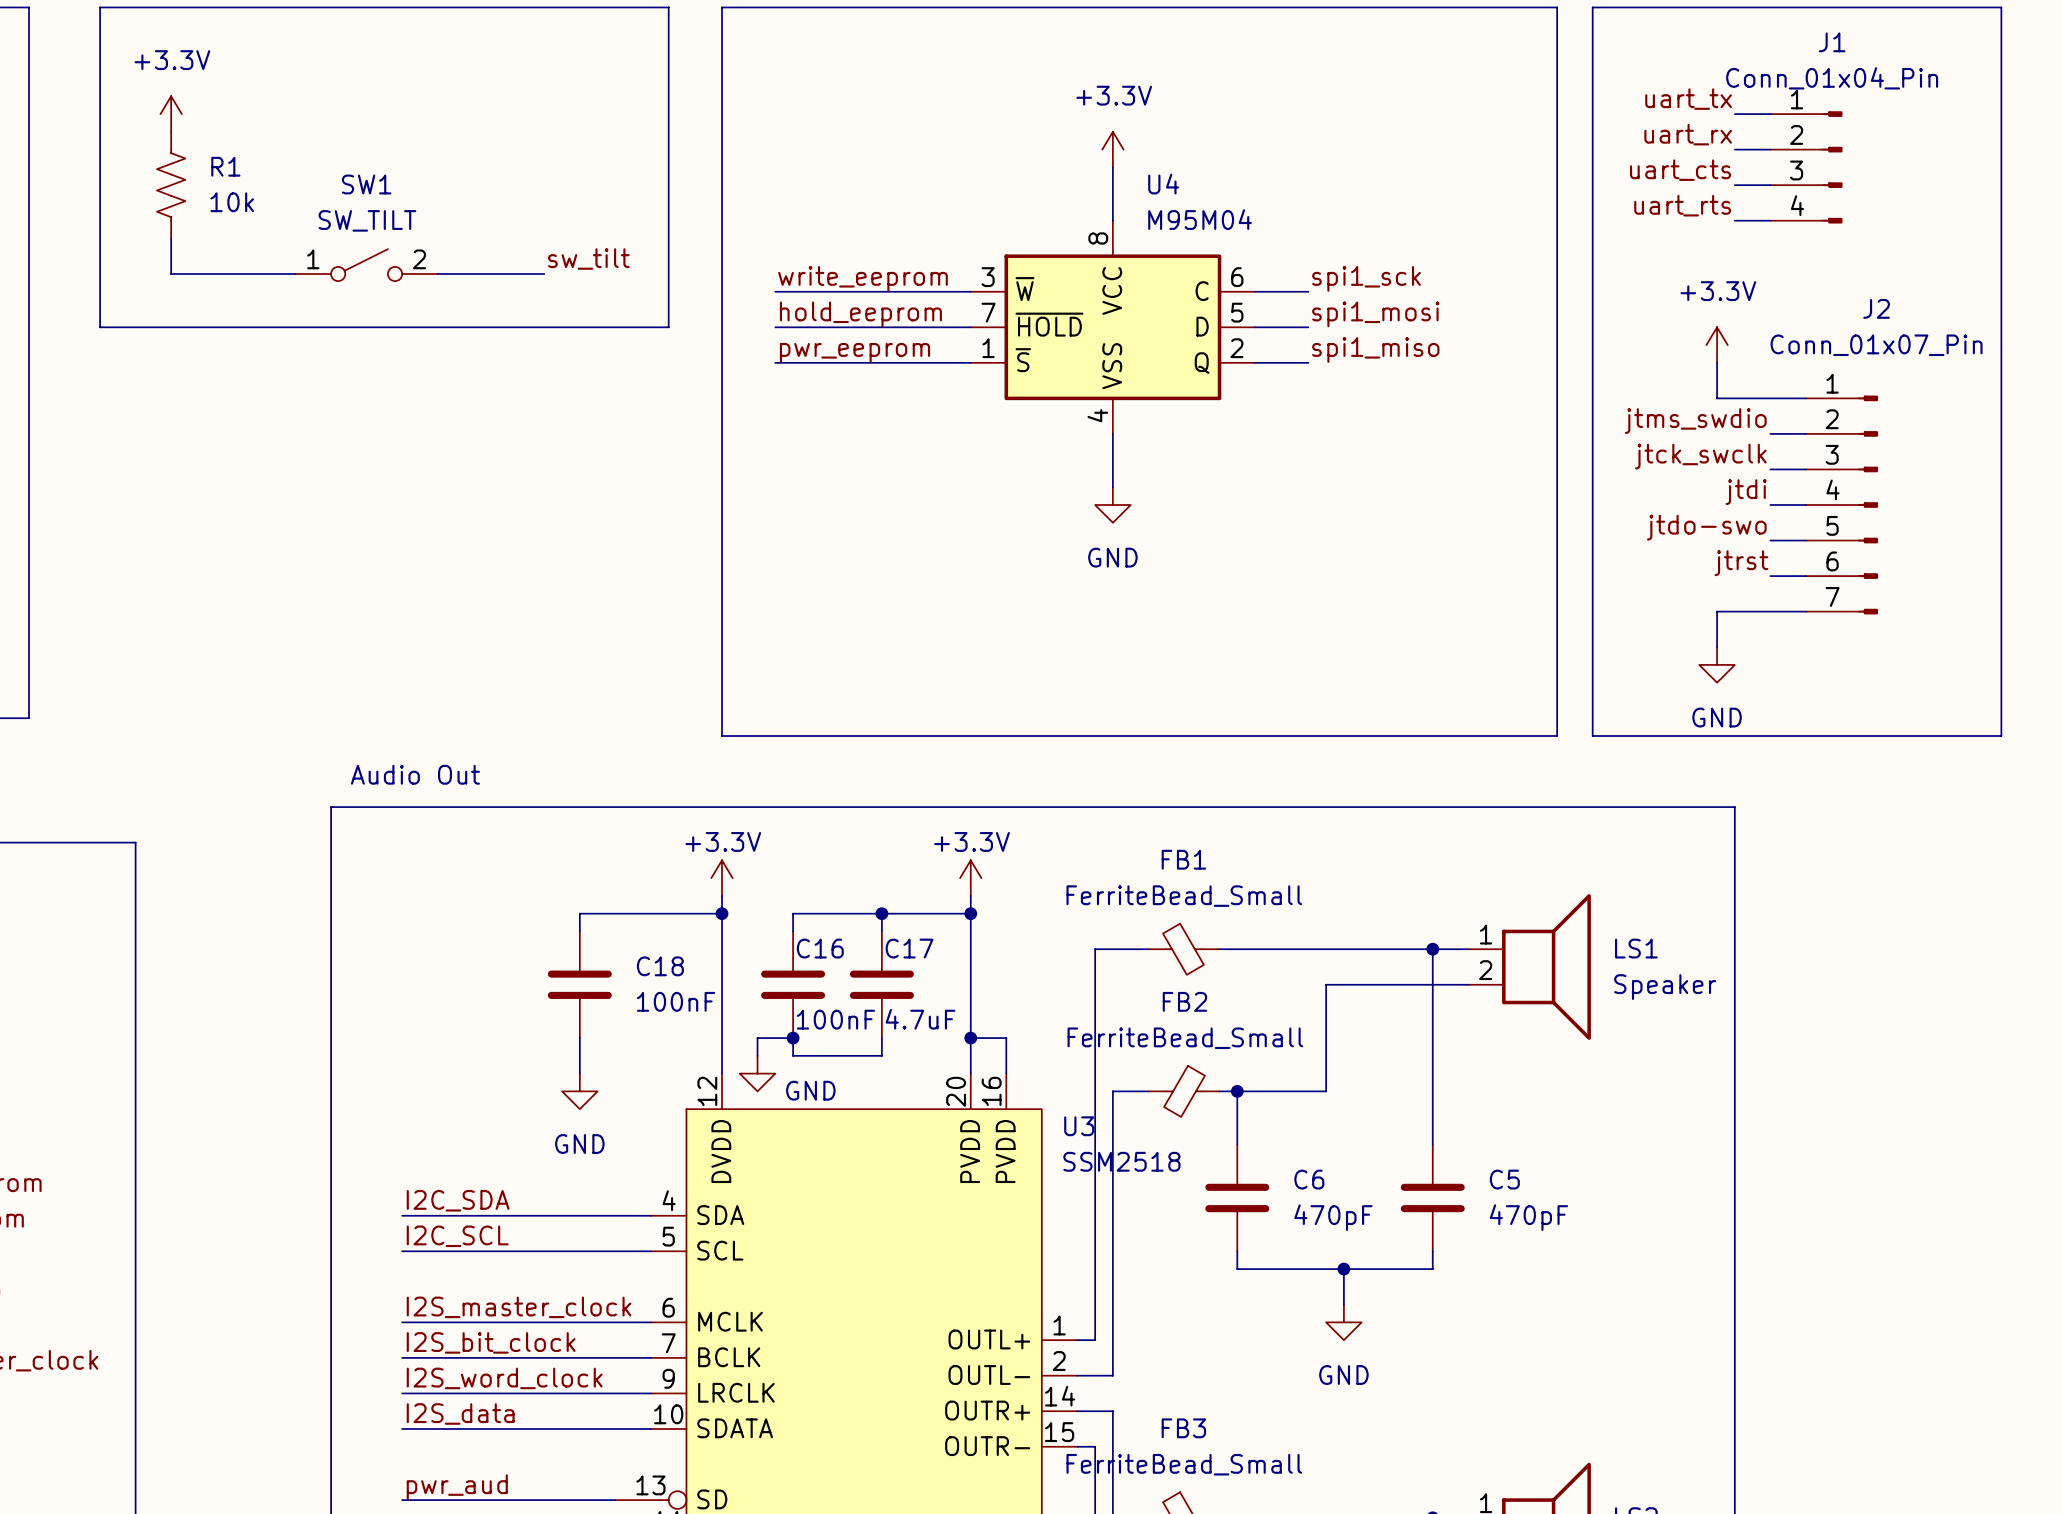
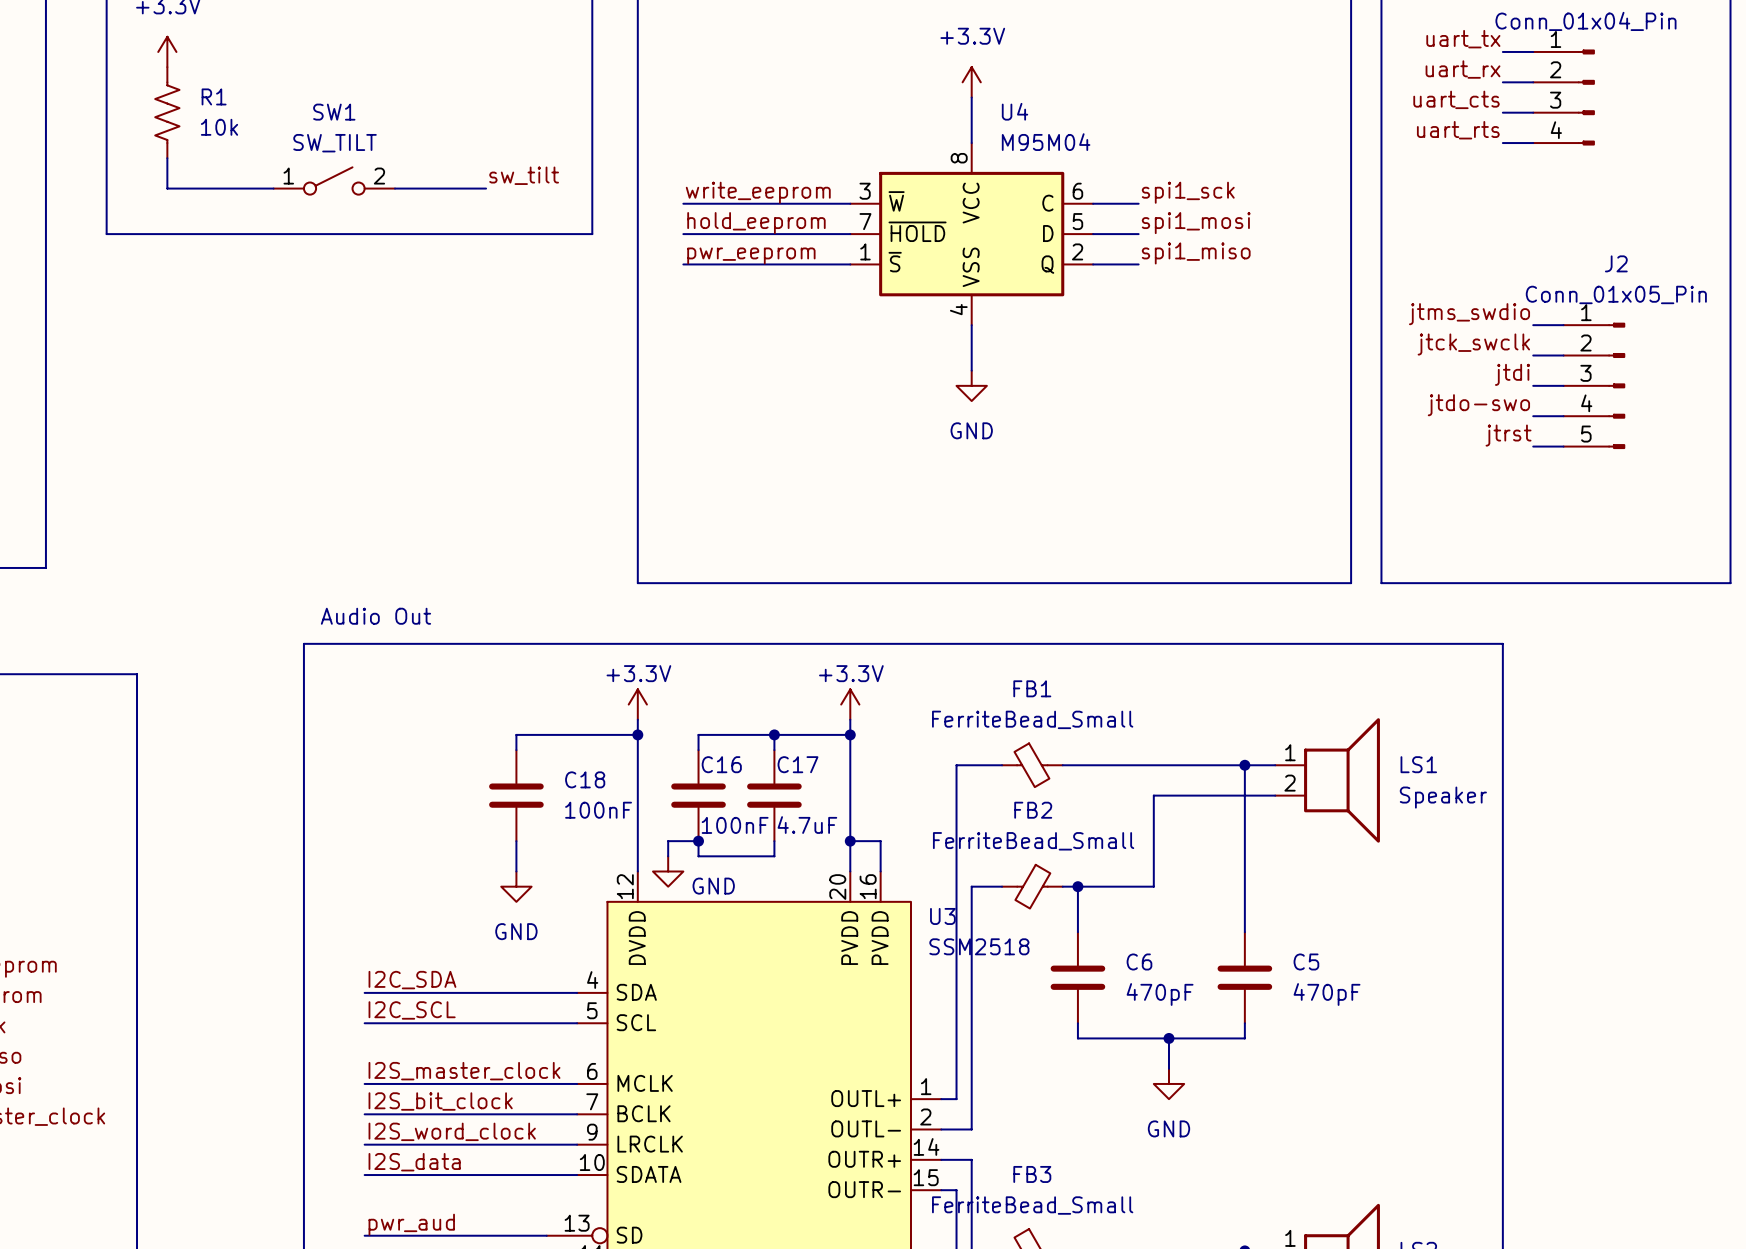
J2 name position: J2 (1876, 308) -> J2 (1616, 263)
power symbol: +3.3V (1717, 345) -> none
J2 value: Conn_01x07_Pin (1876, 345) -> Conn_01x05_Pin (1616, 294)
wire: (1717, 362) (1717, 398) (1805, 398) -> none
J2 symbol: [1805, 395, 1879, 615] -> [1563, 322, 1626, 449]
wire: (1805, 611) (1717, 611) (1717, 647) -> none
power symbol: GND (1717, 664) -> none

